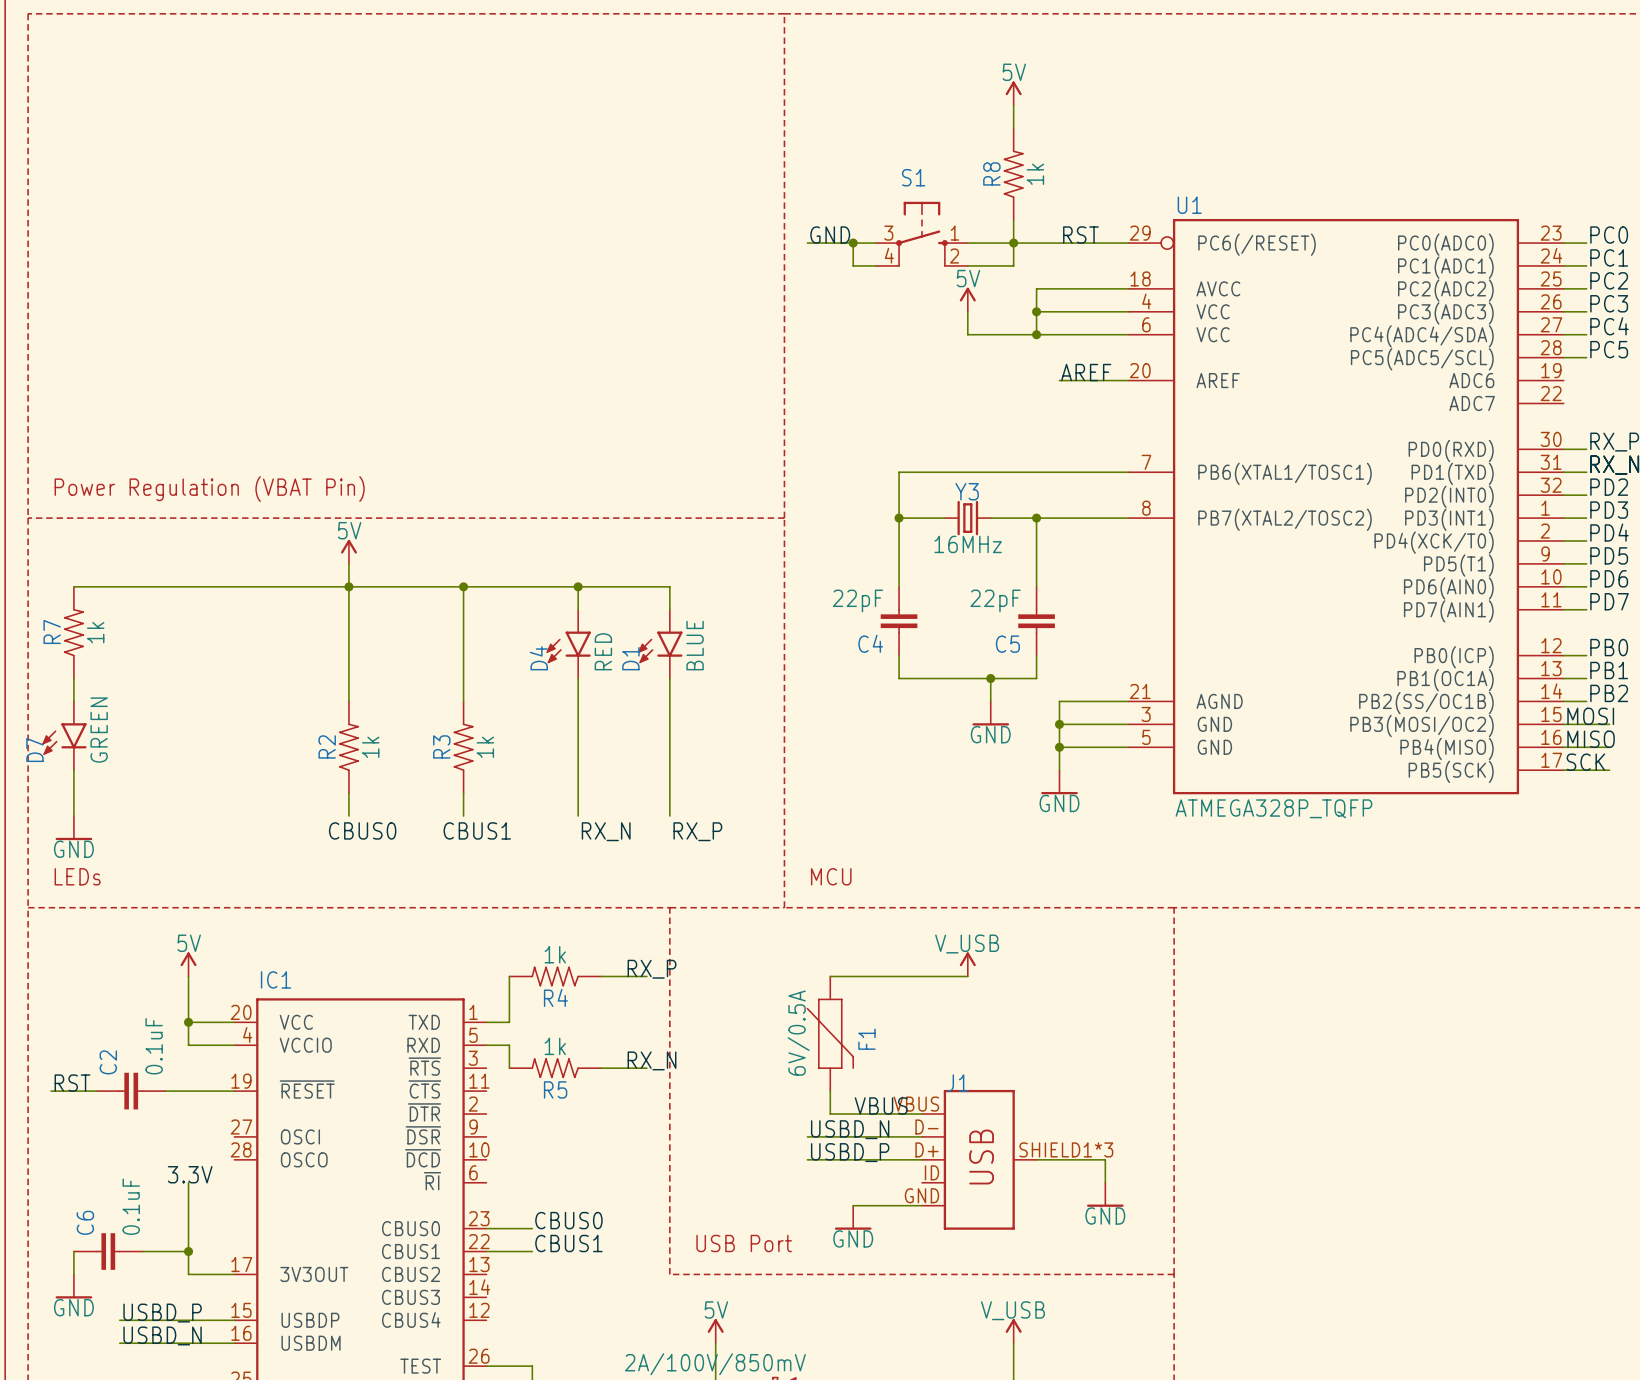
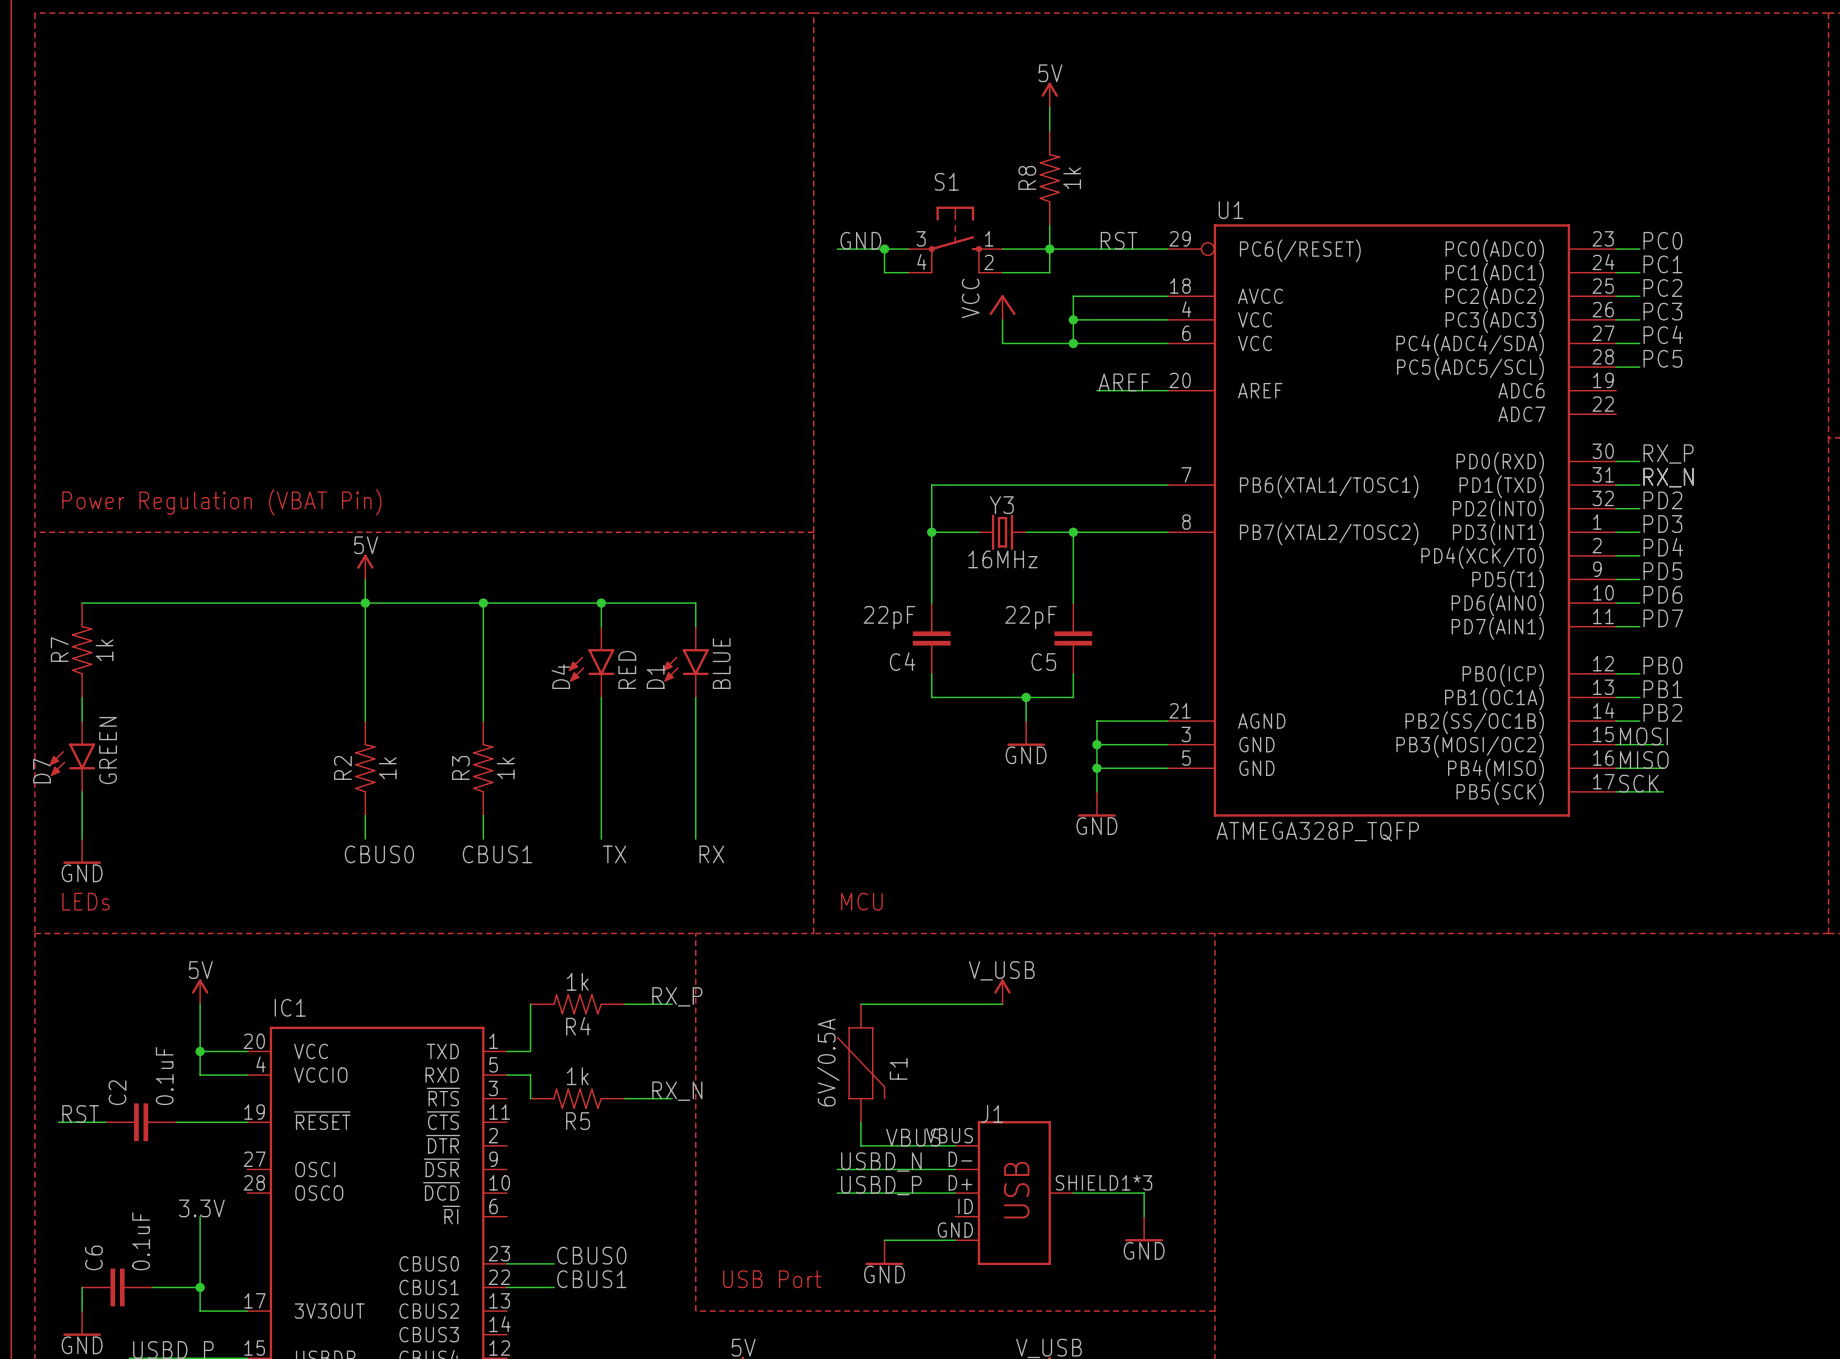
power symbol: 5V (967, 299) -> VCC (1002, 307)
label: RX_N (606, 831) -> TX (614, 854)
label: RX_P (697, 831) -> RX (711, 854)

